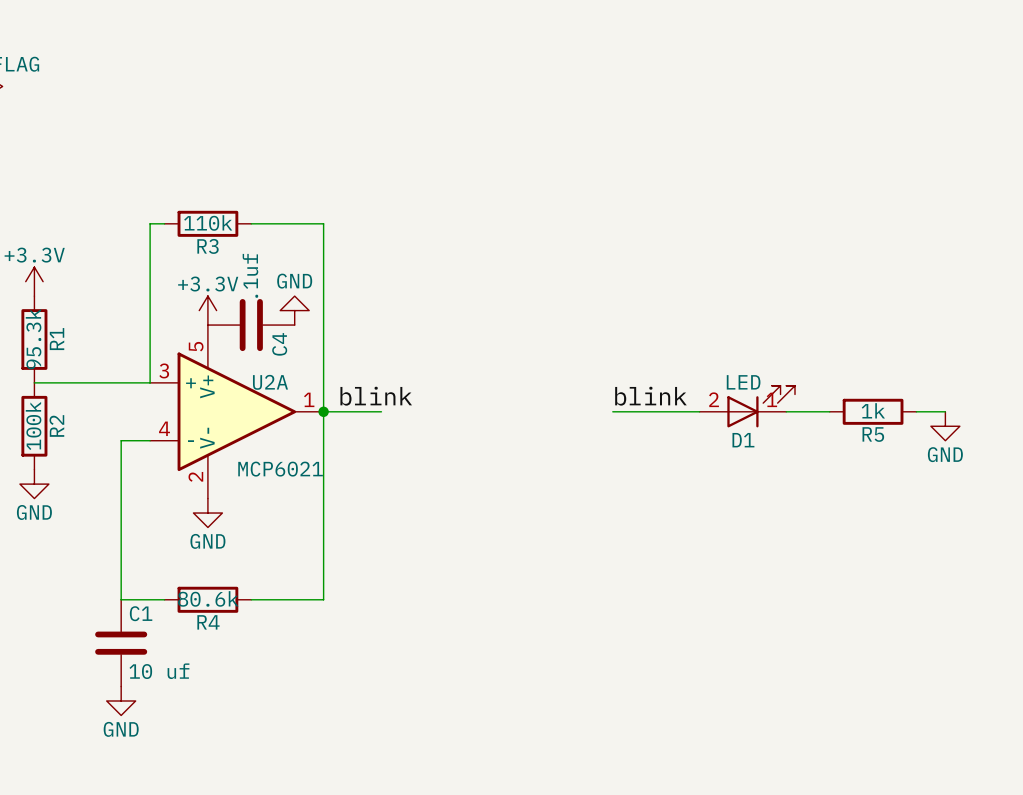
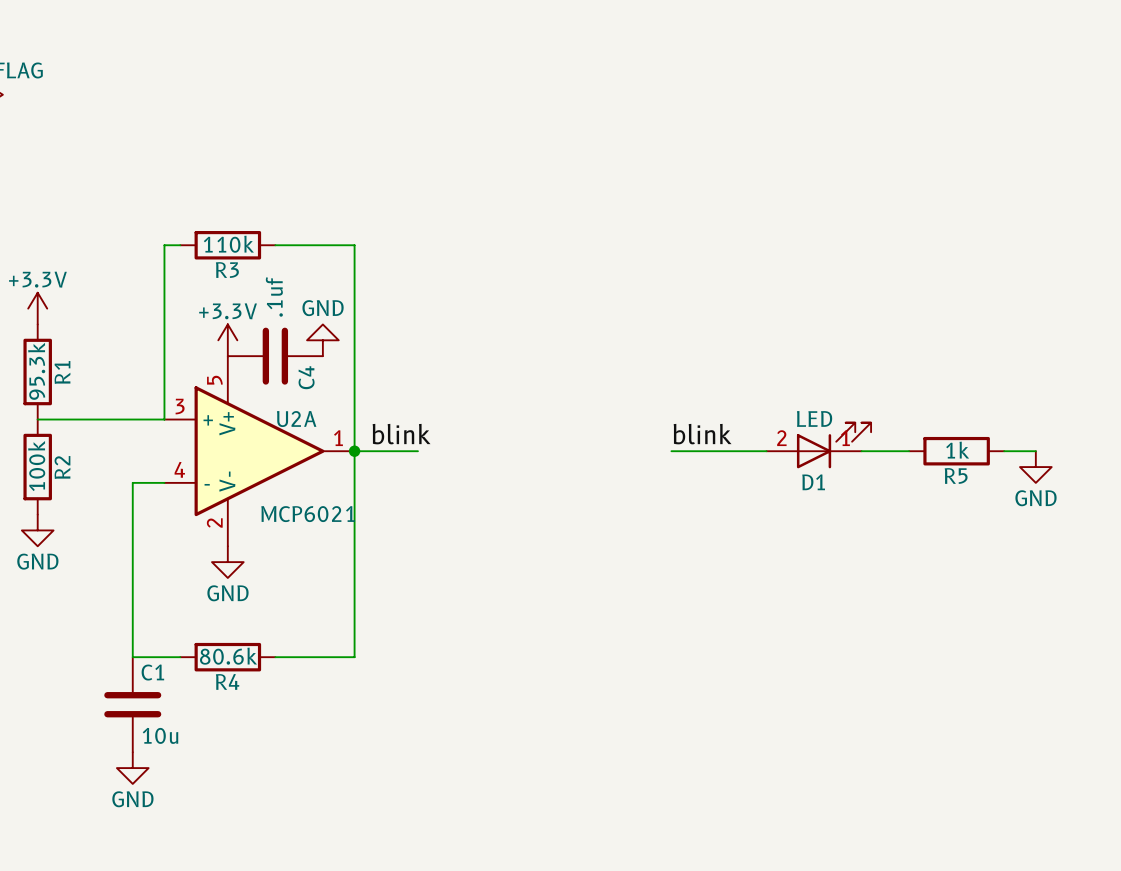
C1 value: 10 uf (159, 671) -> 10u (160, 735)

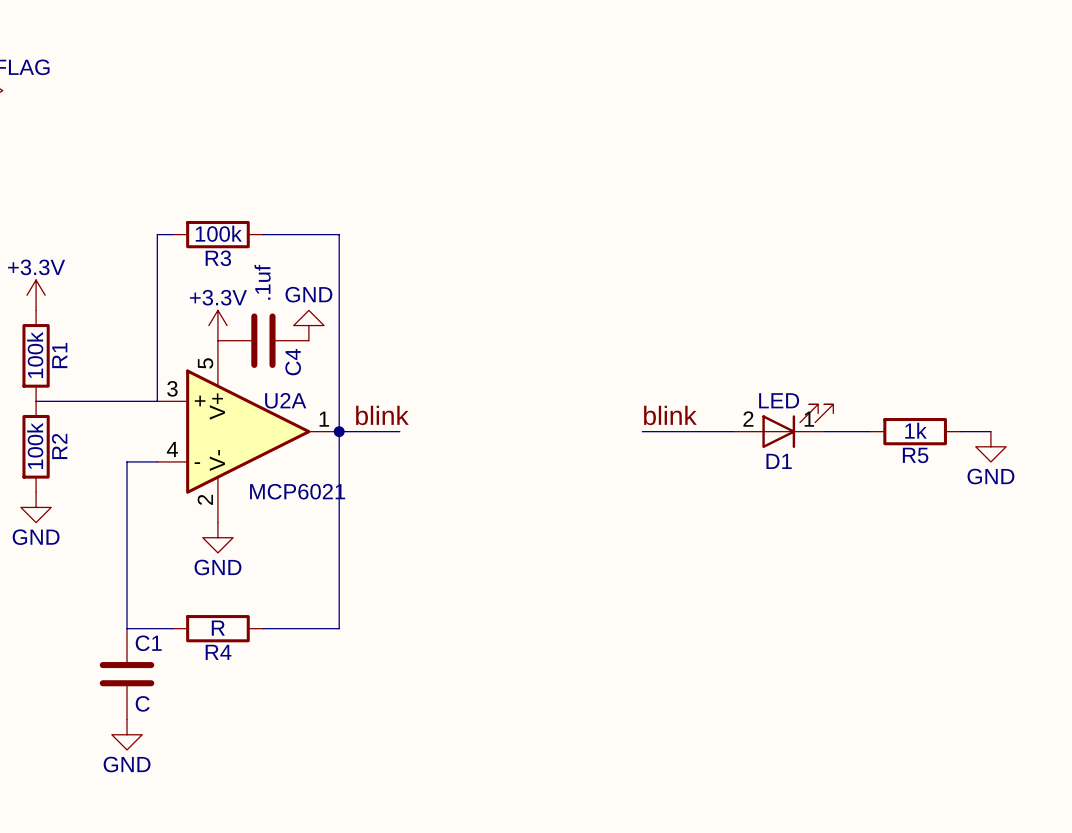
R3 value: 110k (228, 244) -> 100k (218, 233)
R1 value: 95.3k (36, 371) -> 100k (35, 355)
R4 value: 80.6k (228, 656) -> R (218, 628)
C1 value: 10u (160, 735) -> C (142, 703)

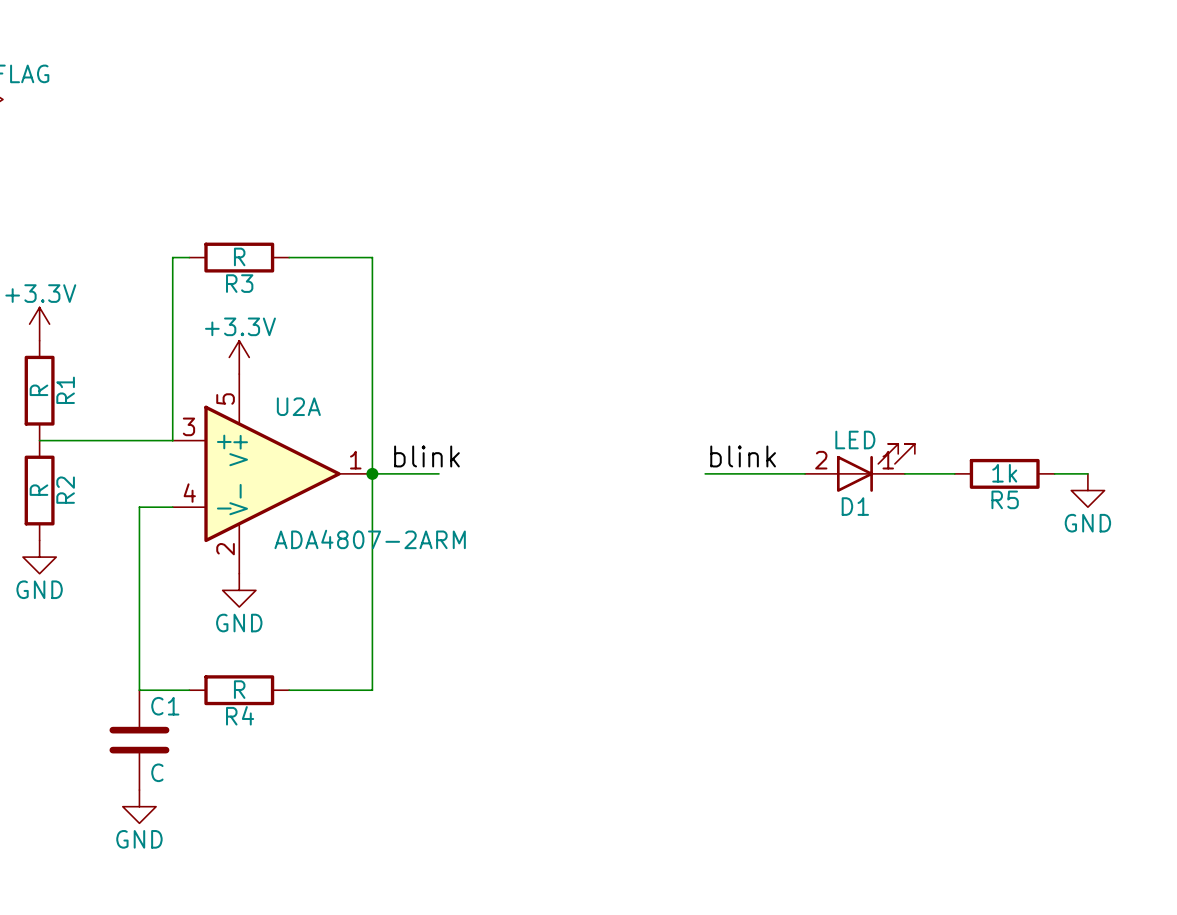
R3 value: 100k (218, 233) -> R (239, 256)
power symbol: GND (308, 325) -> none
C4: .1uf (263, 340) -> none
R1 value: 100k (35, 355) -> R (38, 390)
U2A name position: U2A (285, 400) -> U2A (298, 406)
R2 value: 100k (35, 445) -> R (38, 490)
U2A value: MCP6021 (297, 491) -> ADA4807-2ARM (370, 539)

